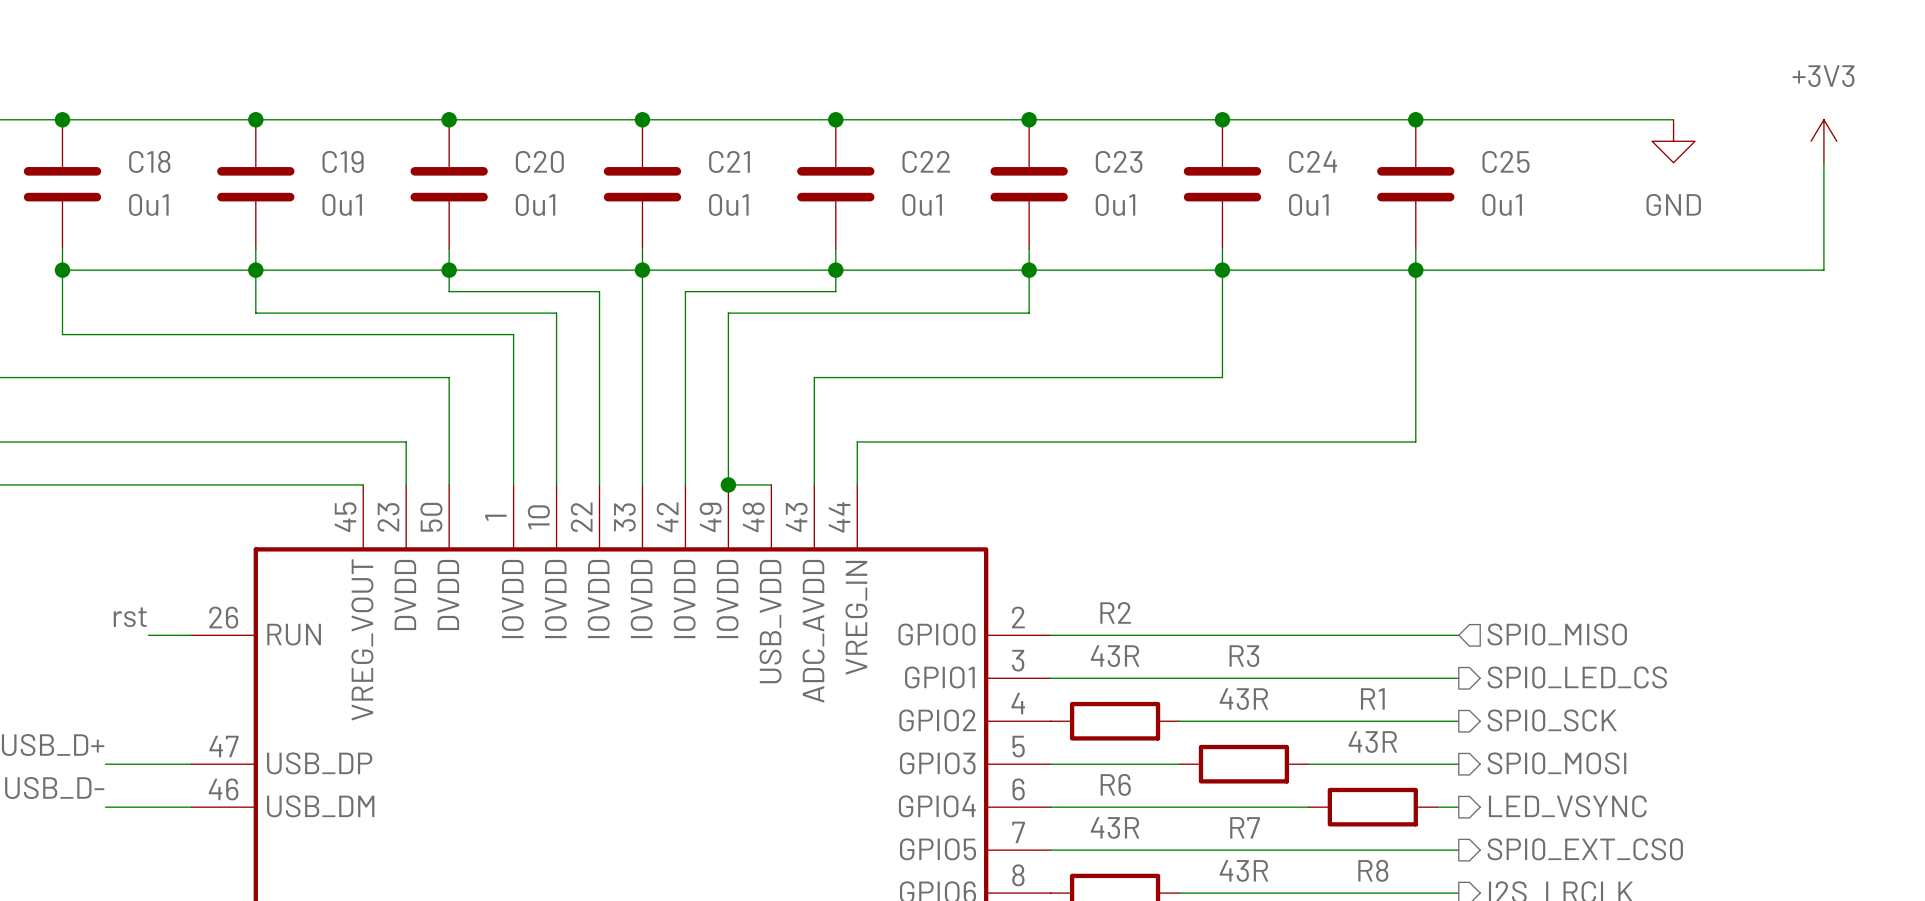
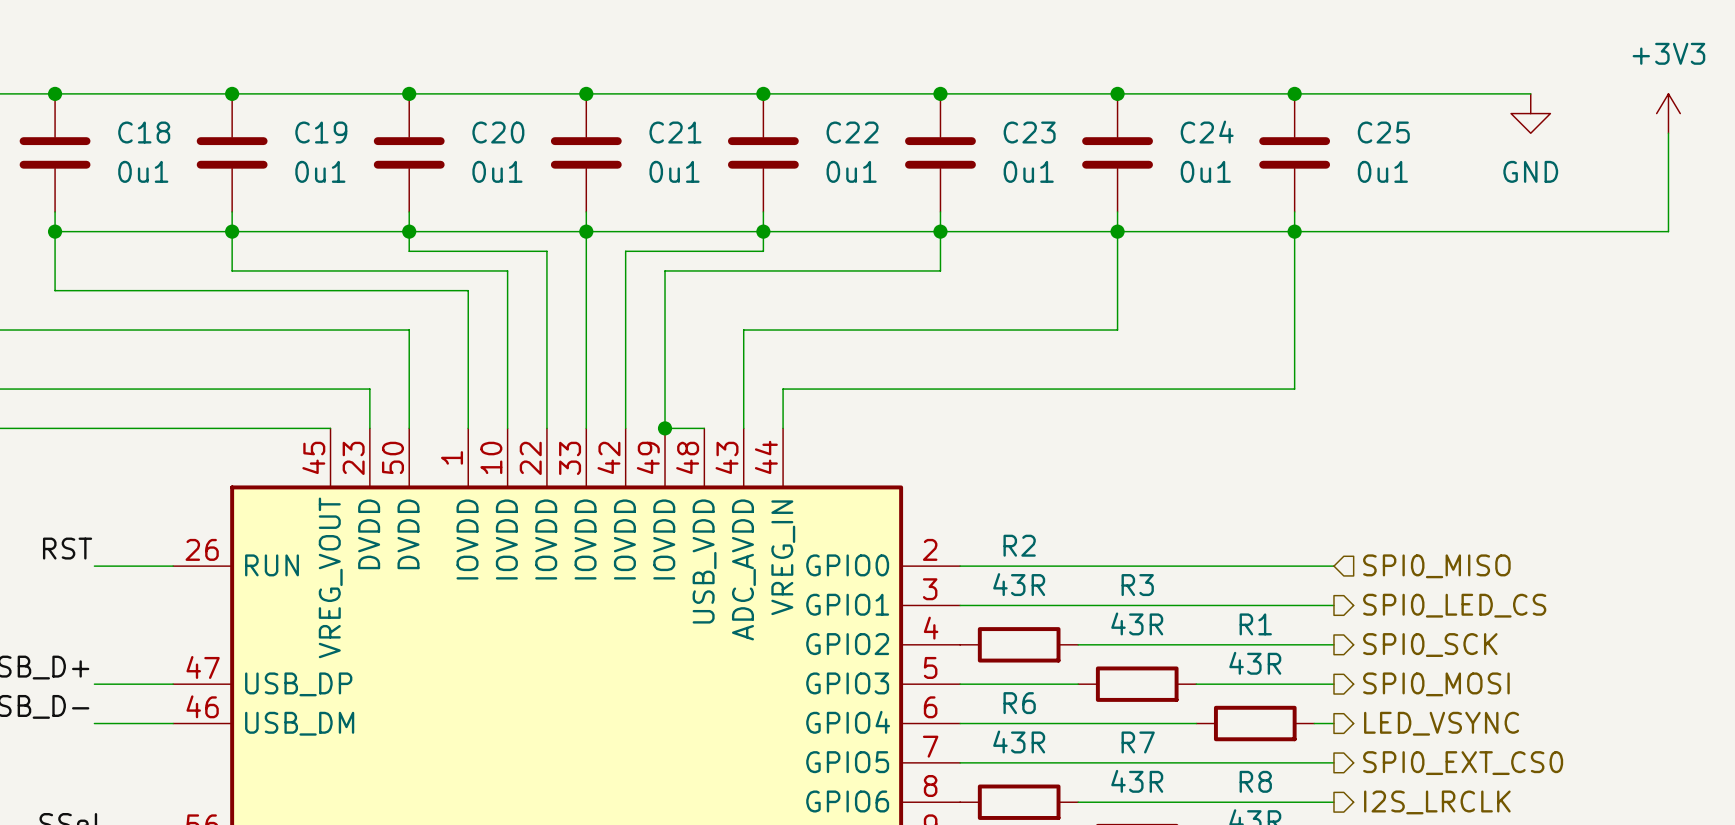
label: none -> RST (67, 548)
label: rst (130, 617) -> none
wire: none -> (94, 566) (133, 566)

